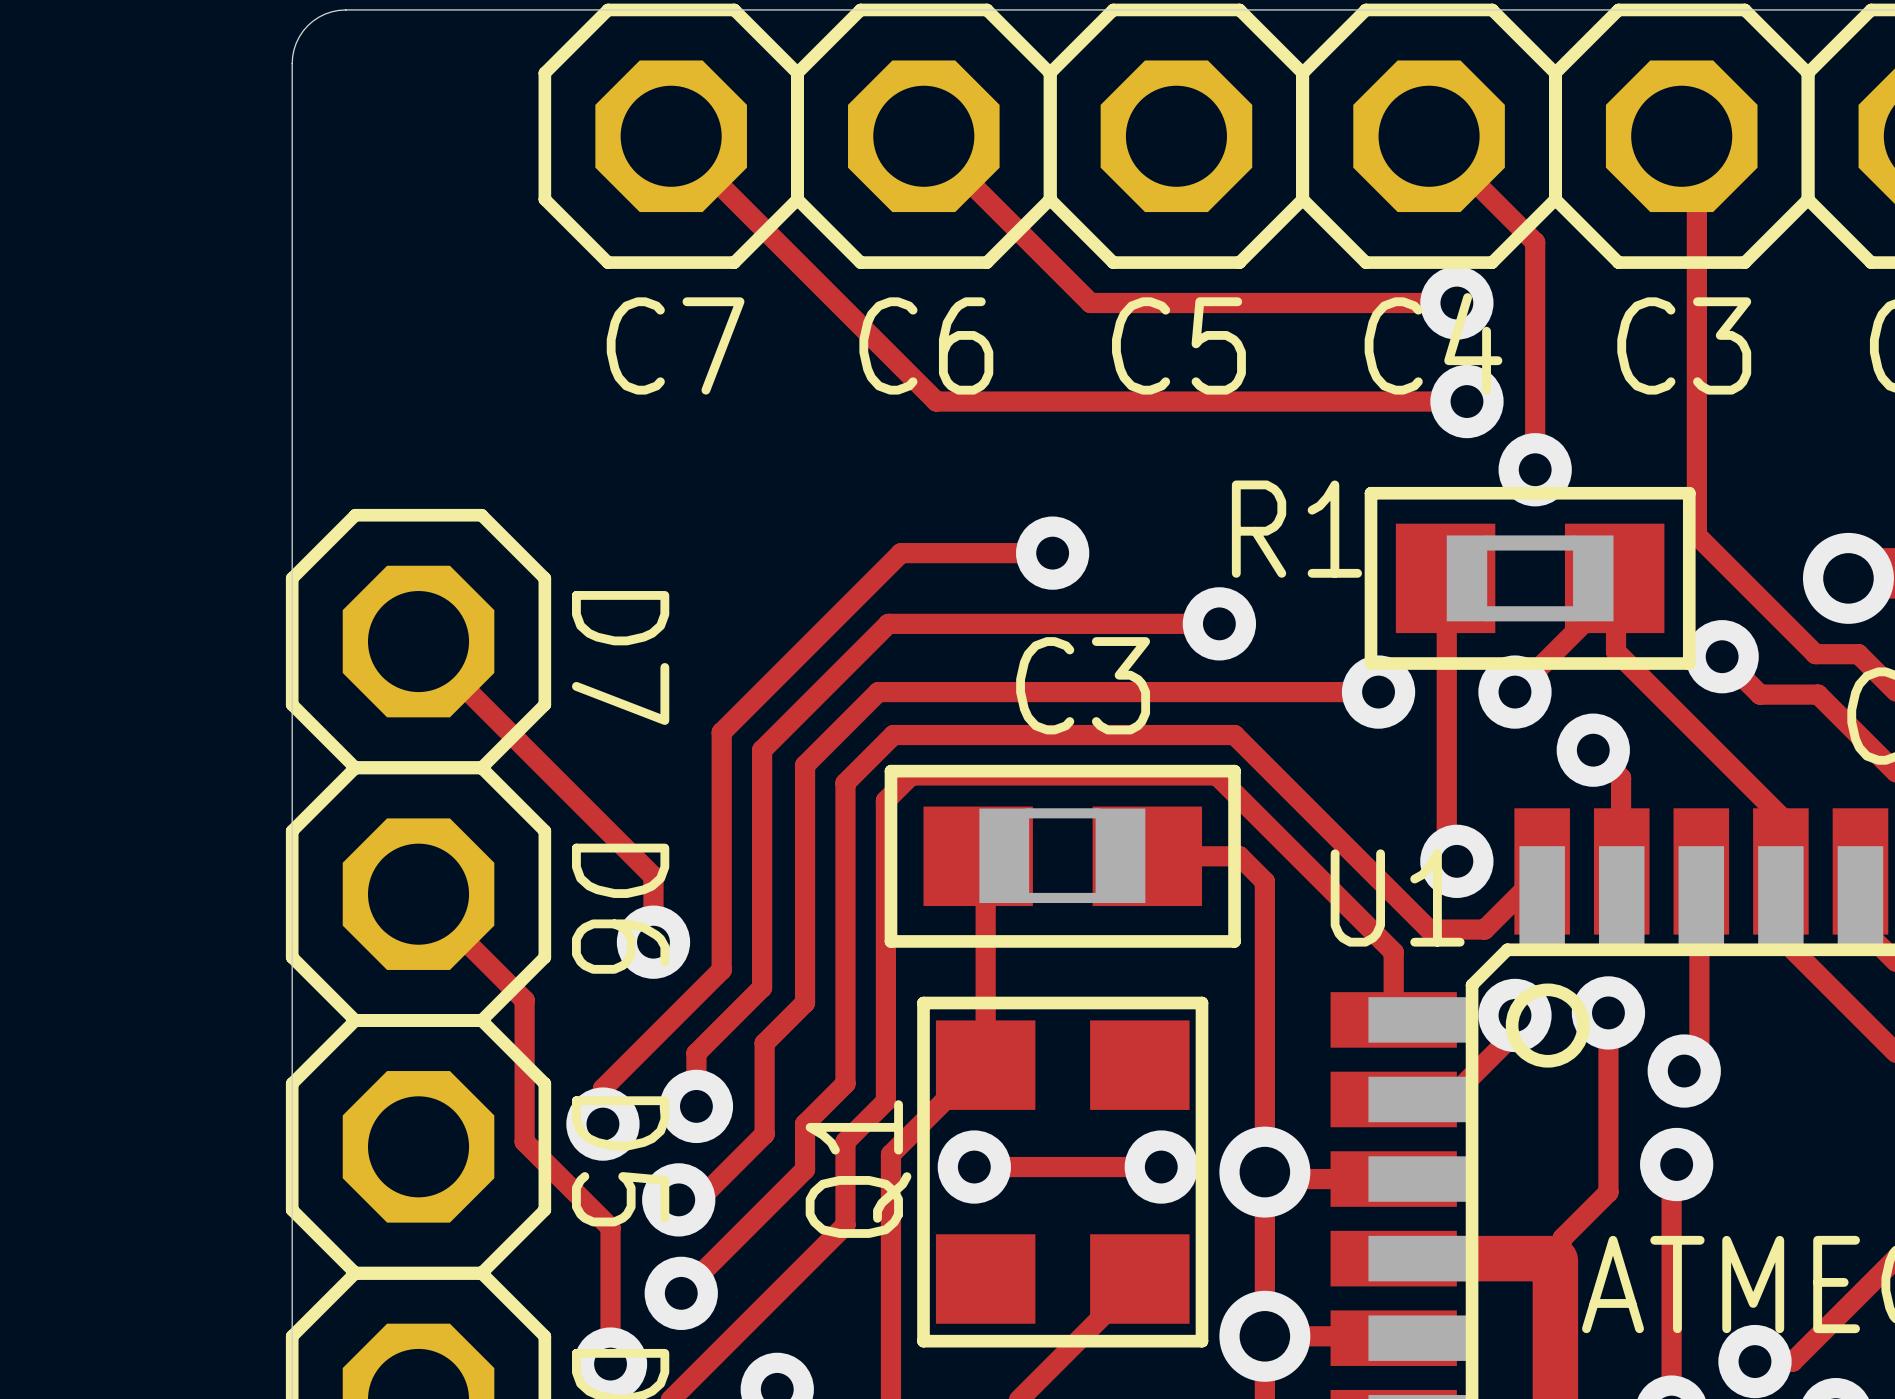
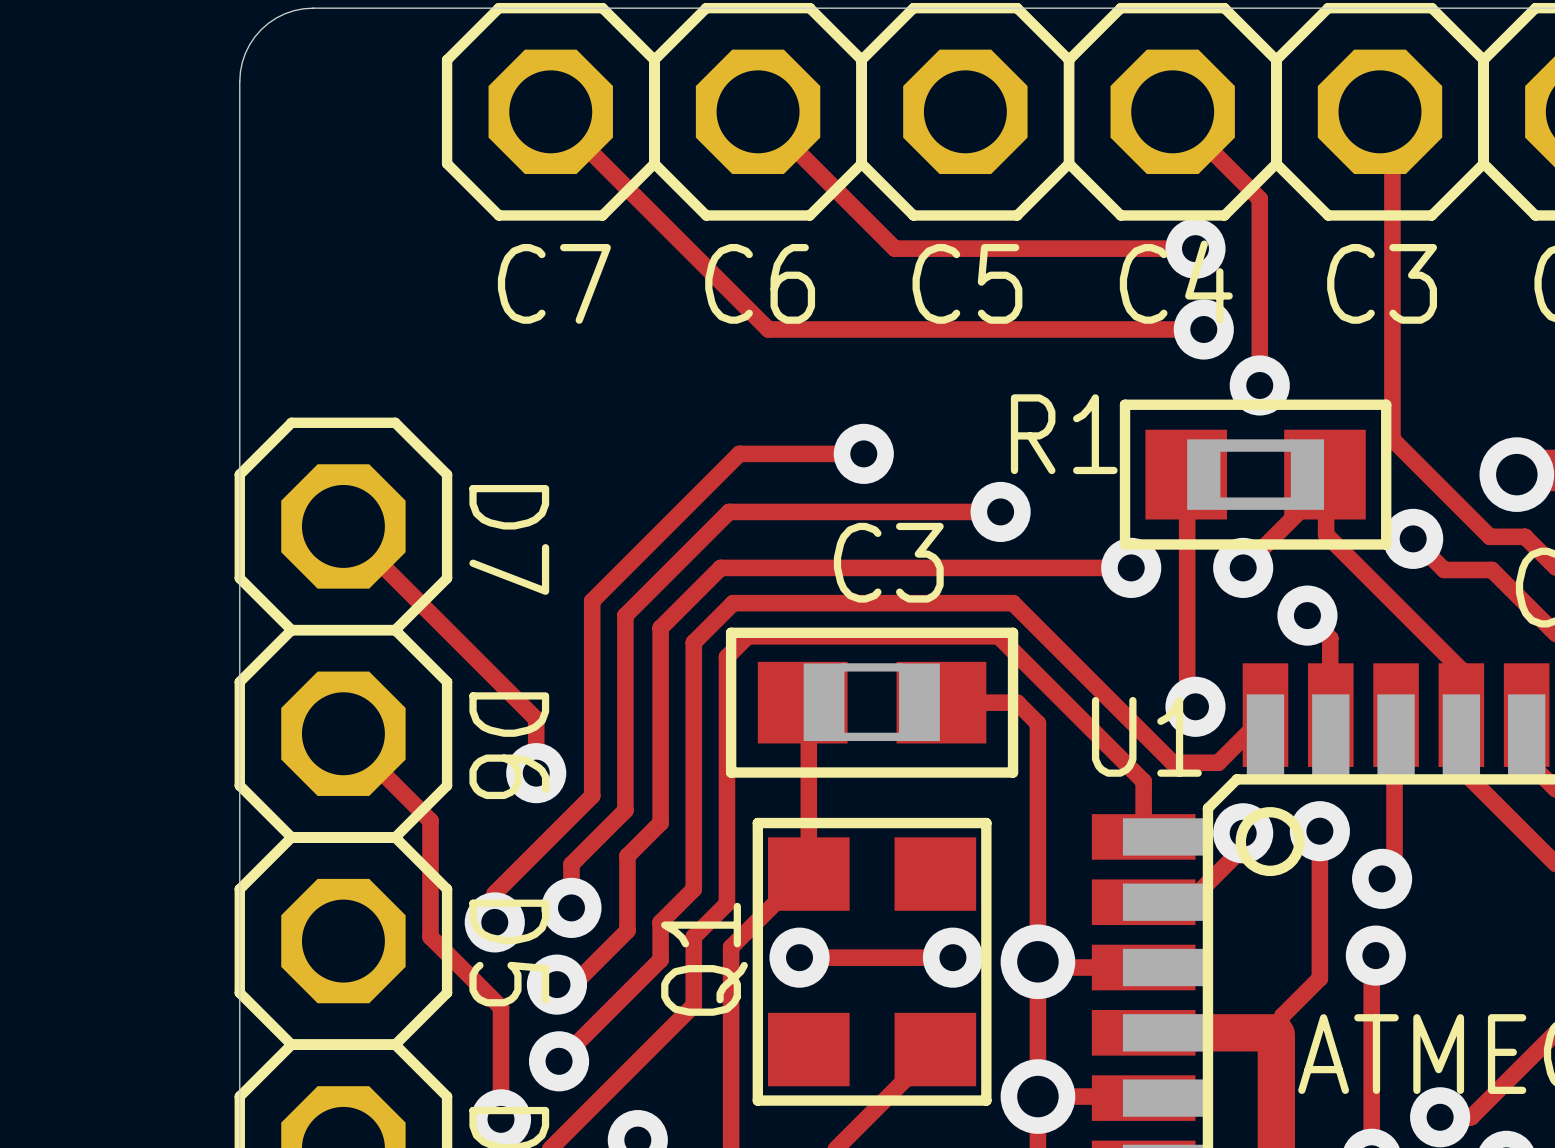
board edge: (381, 9) (331, 11) (319, 17) (307, 25) (299, 36) (294, 49) (292, 99) -> (313, 8) (285, 13) (261, 29) (245, 53) (239, 81)

